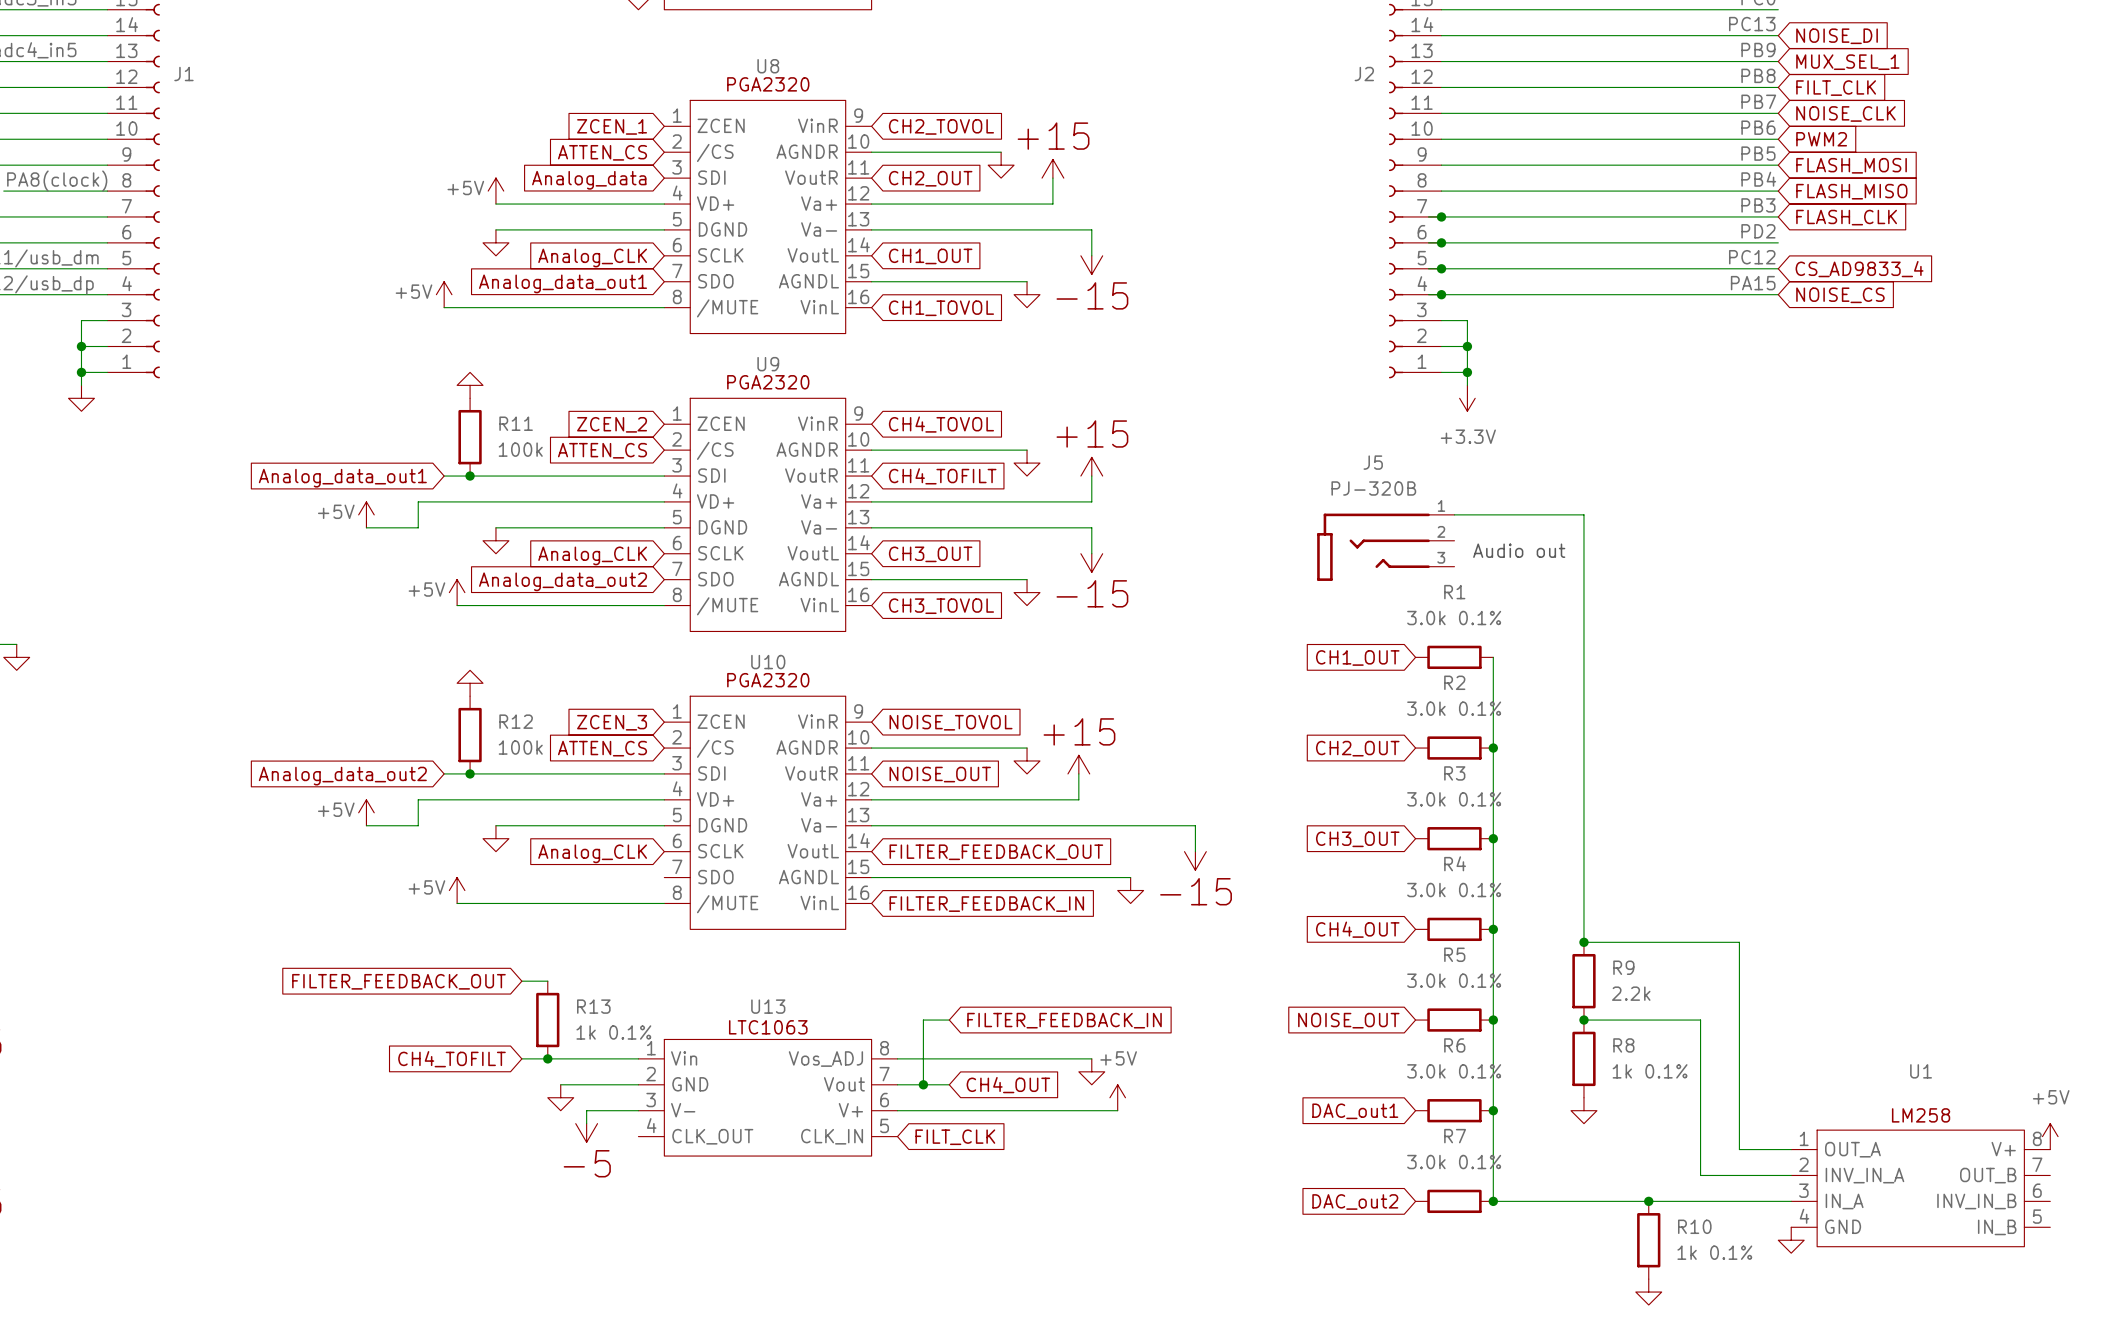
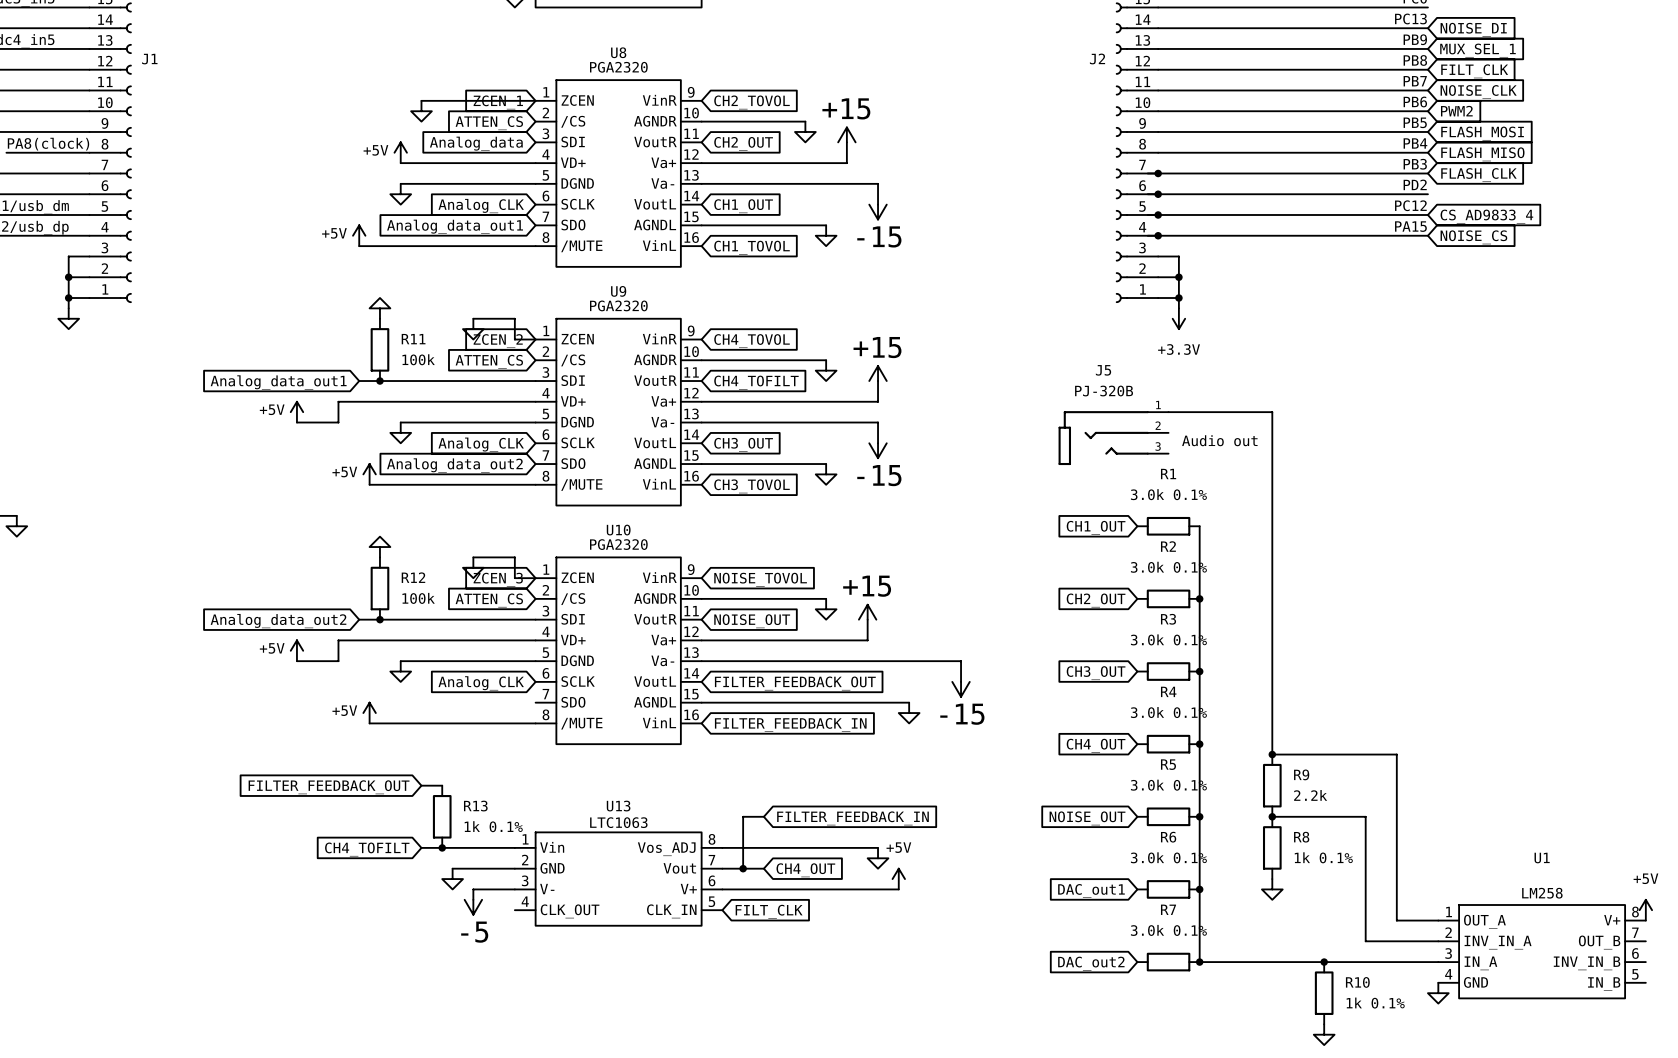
wire: none -> (421, 100) (535, 100)
power symbol: none -> (421, 111)
wire: none -> (473, 318) (514, 318) (514, 339) (535, 339)
power symbol: none -> (473, 329)
wire: none -> (473, 557) (514, 557) (514, 578) (535, 578)
power symbol: none -> (473, 567)

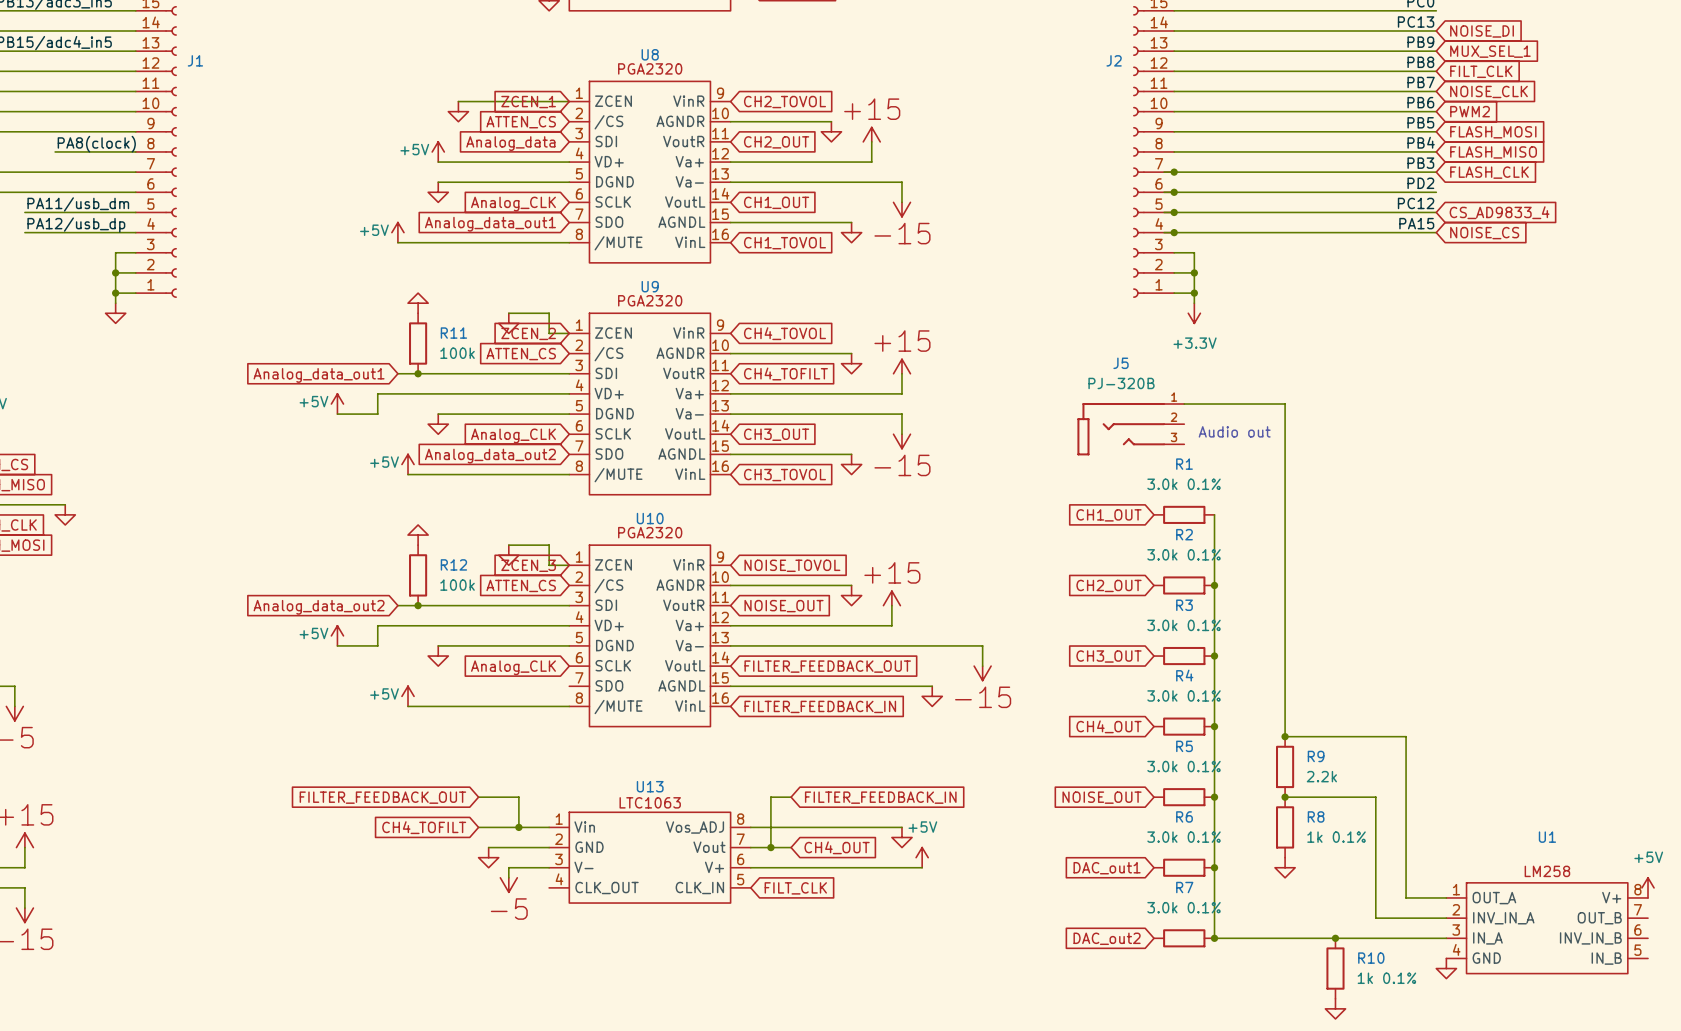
wire: (421, 785) (442, 785) -> none
global label position: FILTER_FEEDBACK_OUT (329, 787) -> FILTER_FEEDBACK_OUT (382, 797)
wire: none -> (478, 797) (518, 797) (518, 827)
R13: (442, 816) -> none
wire: (421, 847) (442, 847) -> none
junction position: (442, 847) -> (518, 827)
global label position: CH4_TOFILT (367, 849) -> CH4_TOFILT (424, 827)

